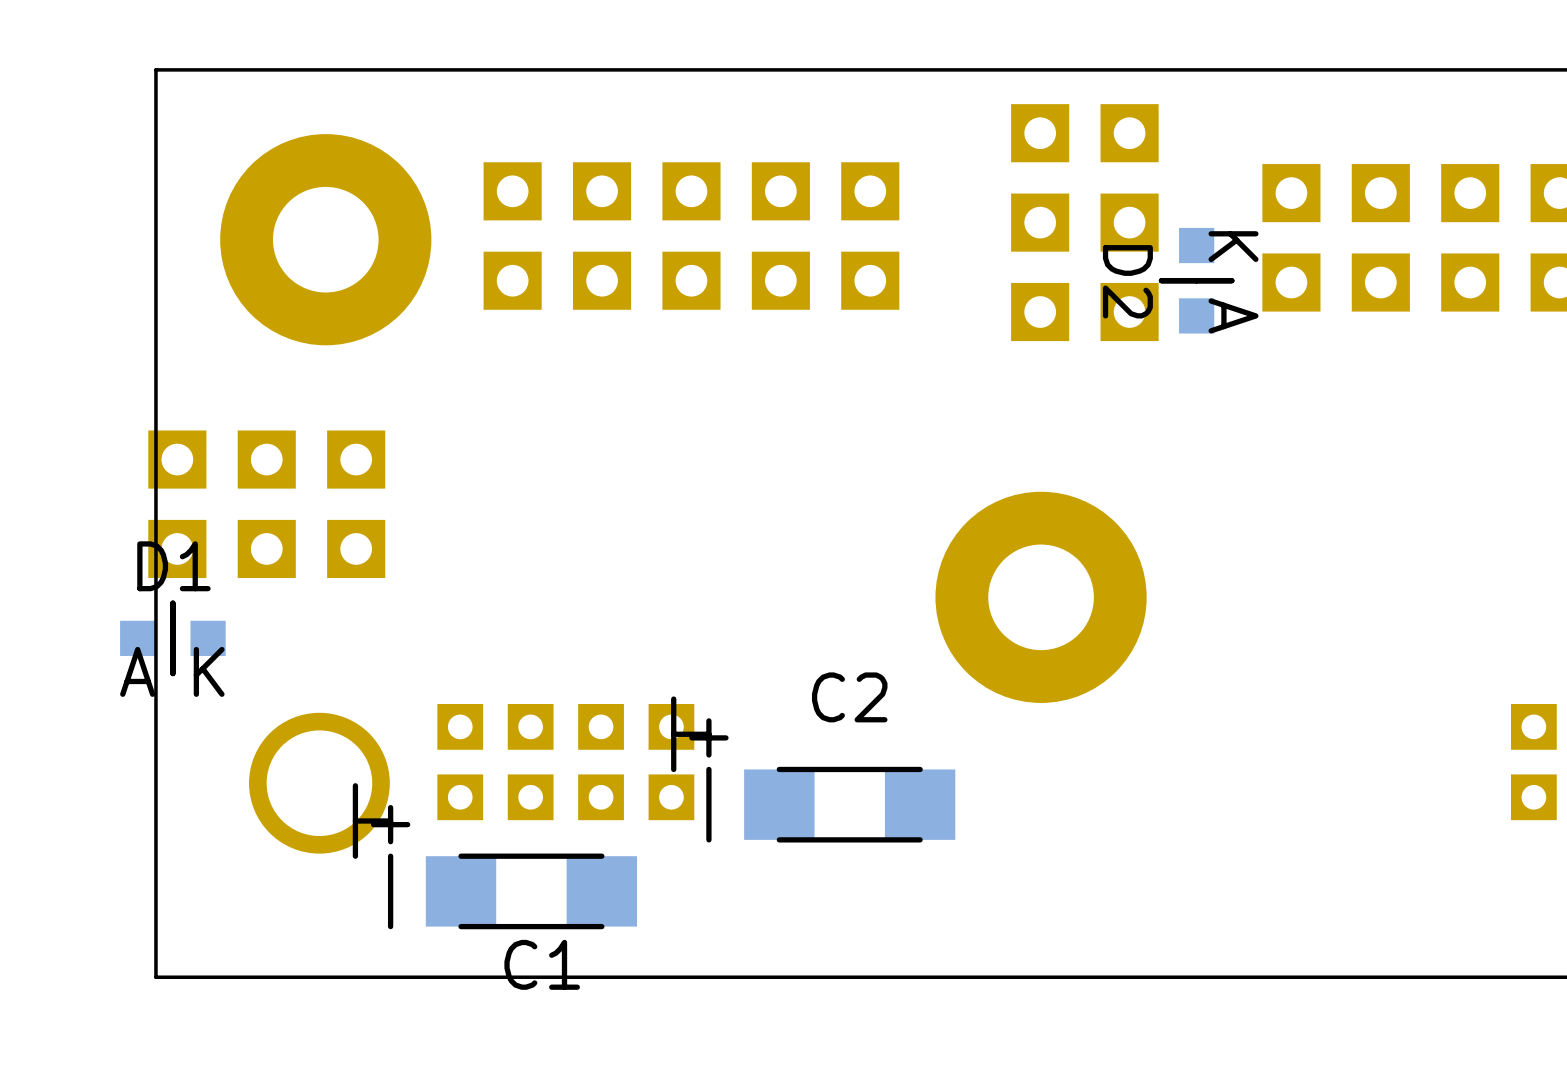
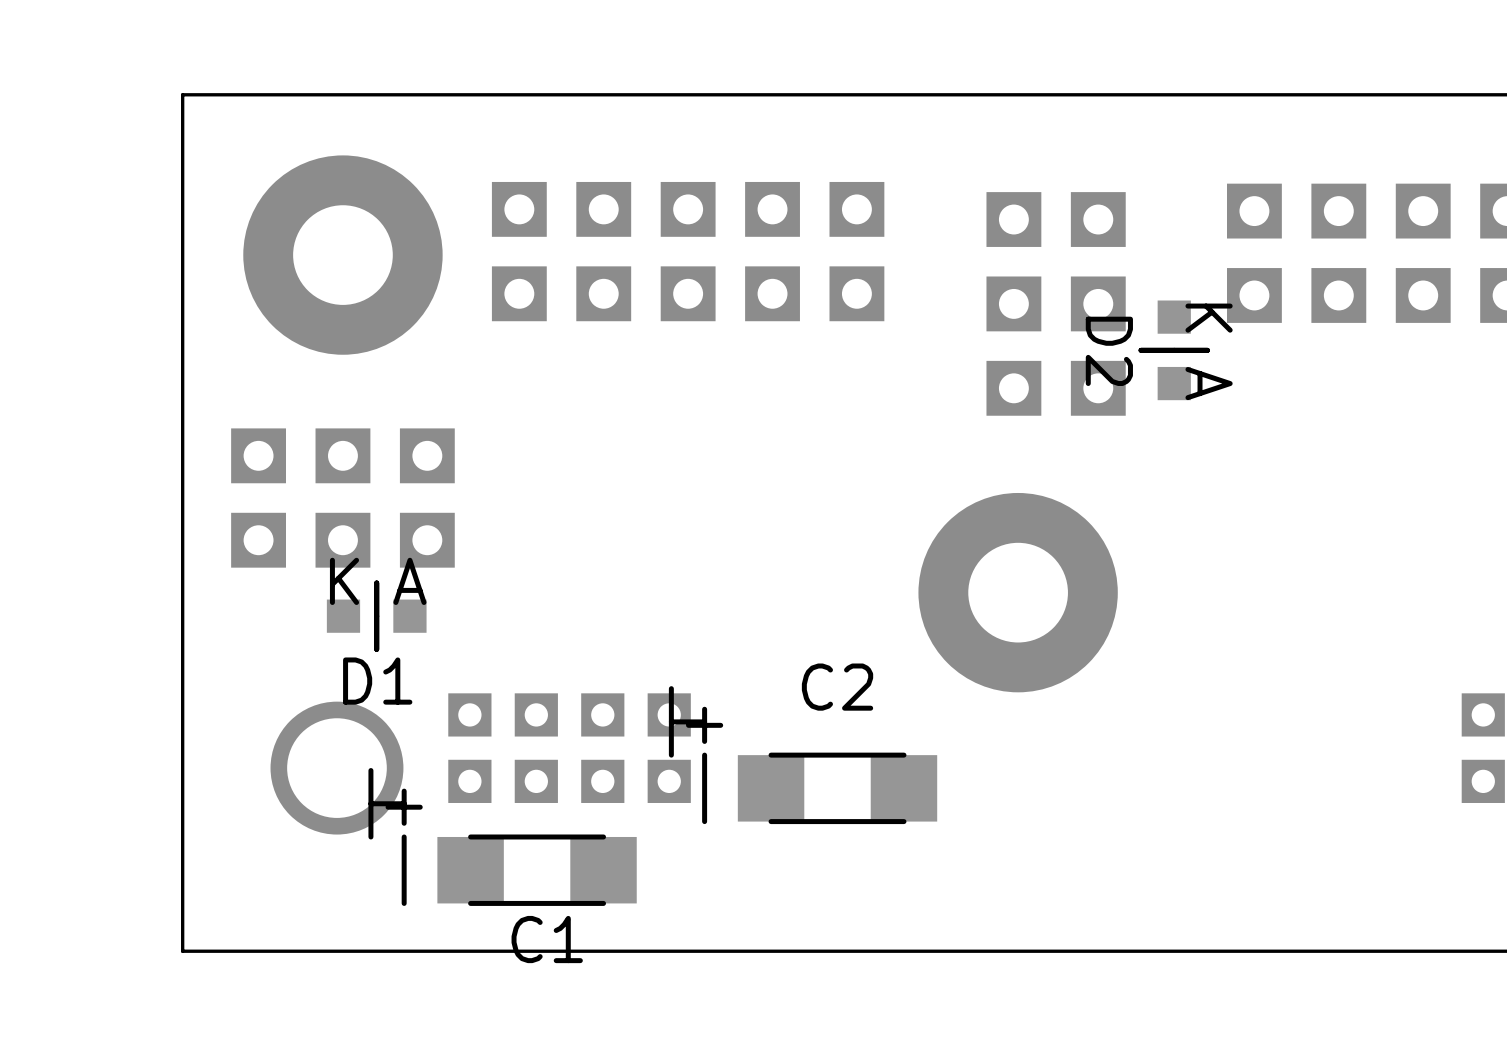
part position: (1084, 222) -> (1056, 303)
D2 position: (1196, 280) -> (1174, 350)
part position: (266, 504) -> (342, 498)
D1 rotation: 0° (172, 638) -> 180° (376, 616)
D1 position: (172, 638) -> (376, 616)

